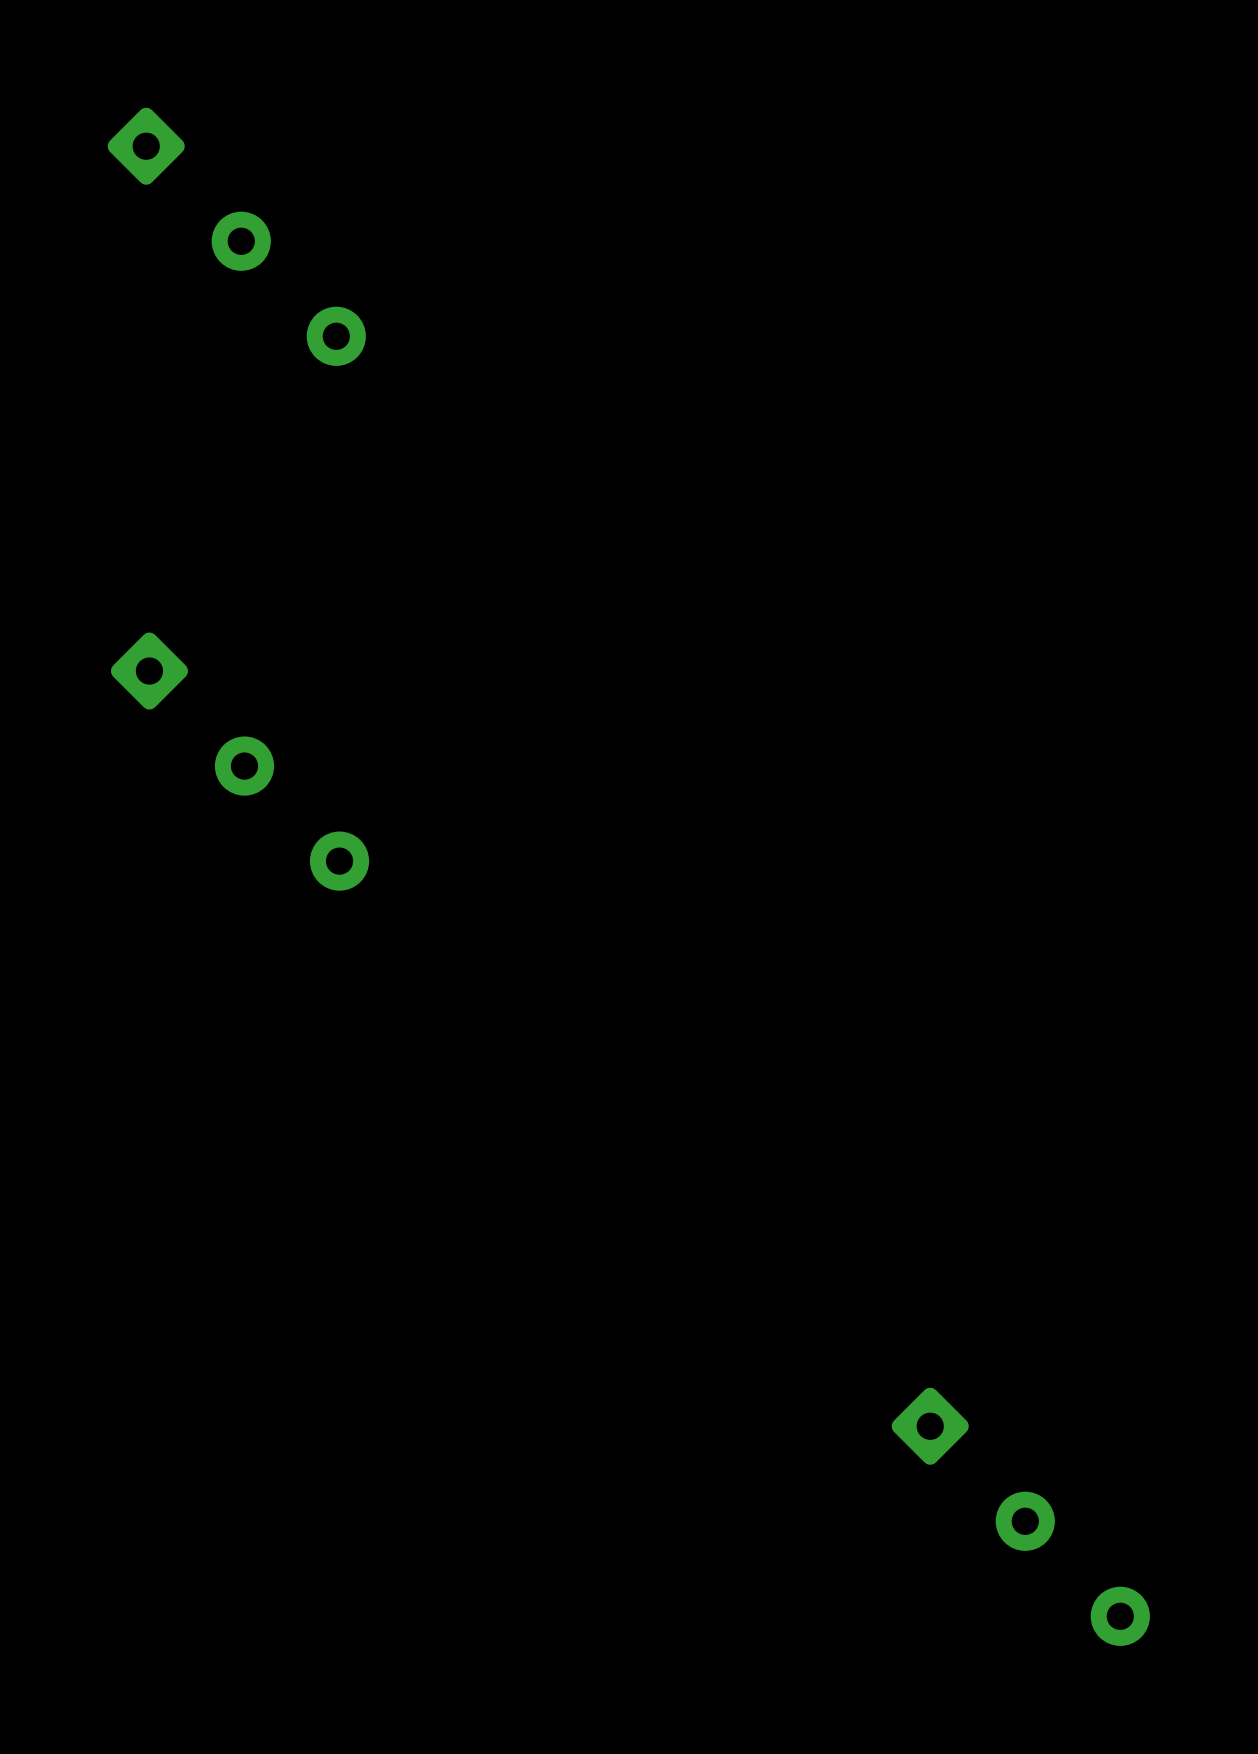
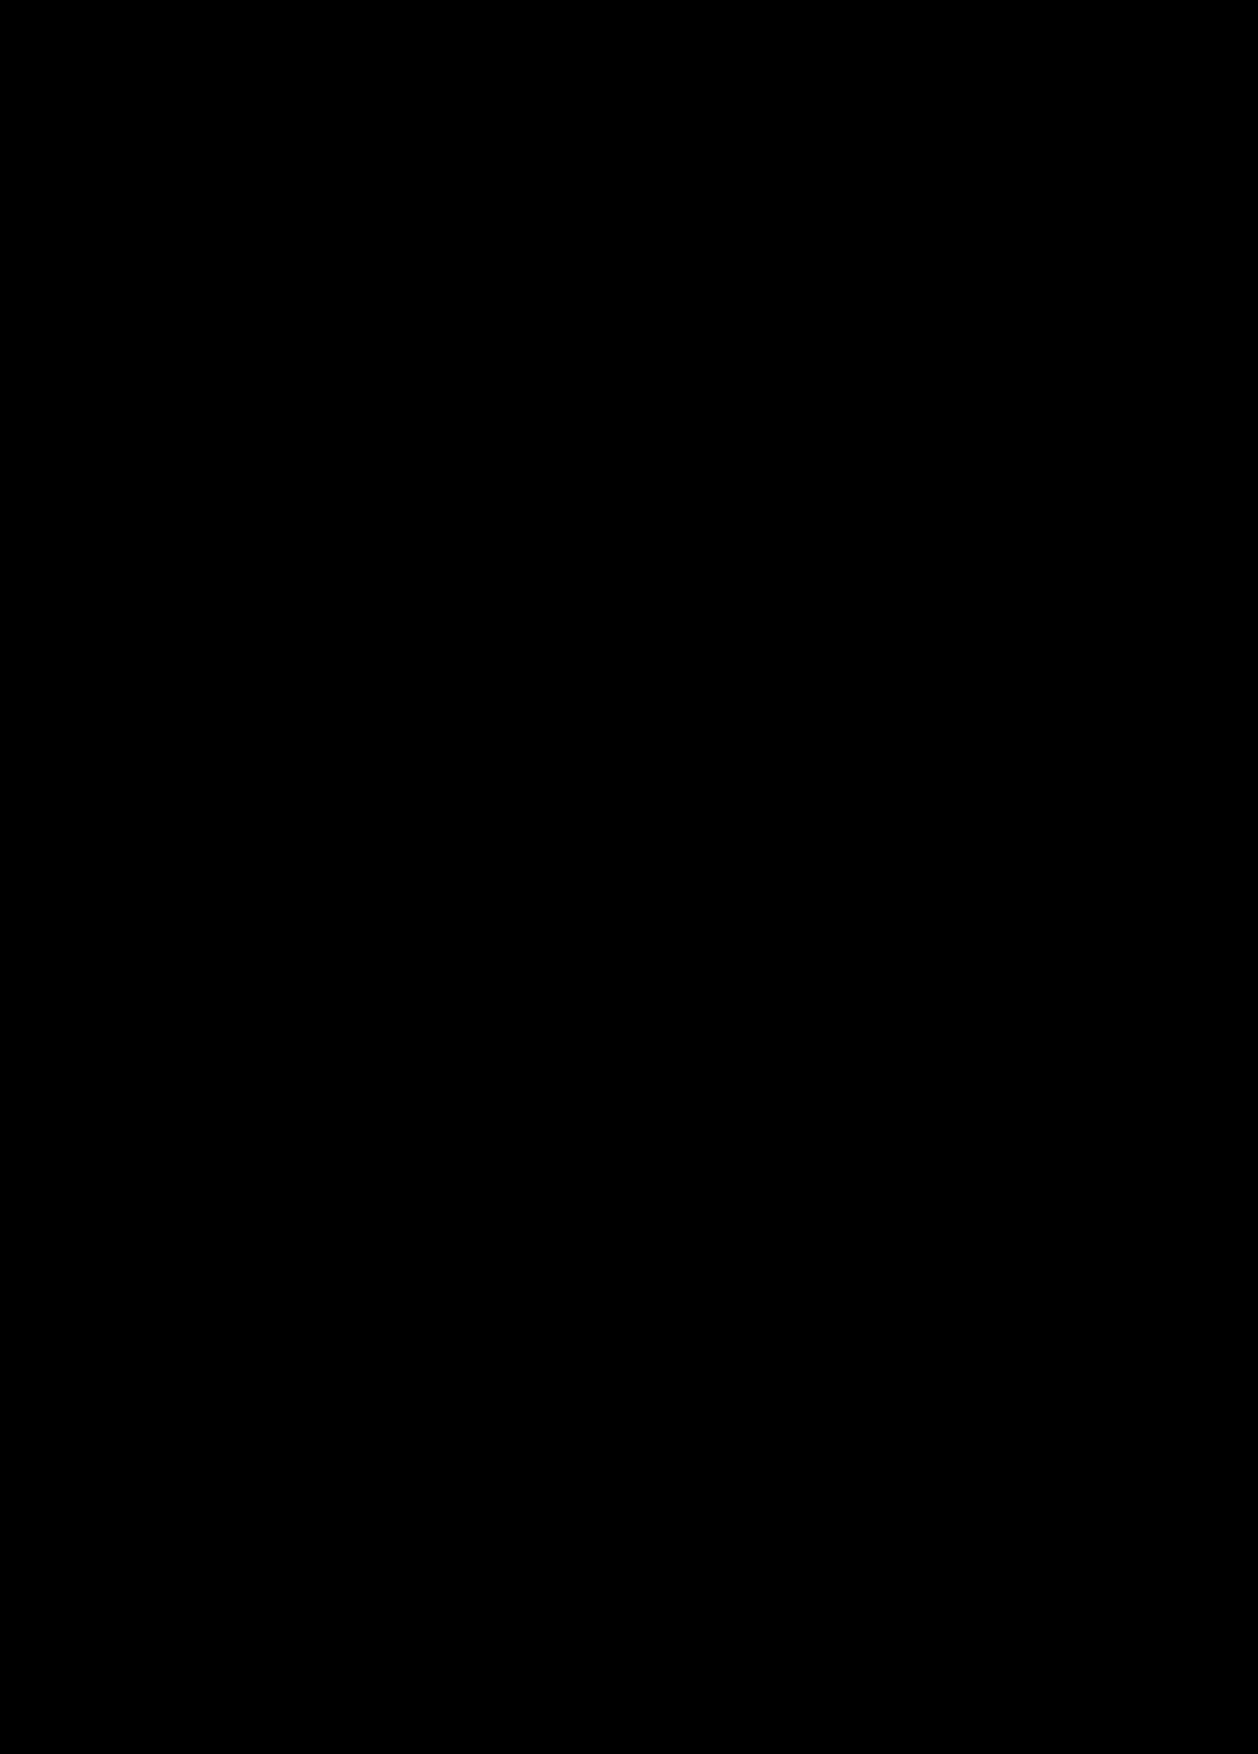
part: (236, 236) -> none
part: (240, 761) -> none
part: (1020, 1516) -> none

